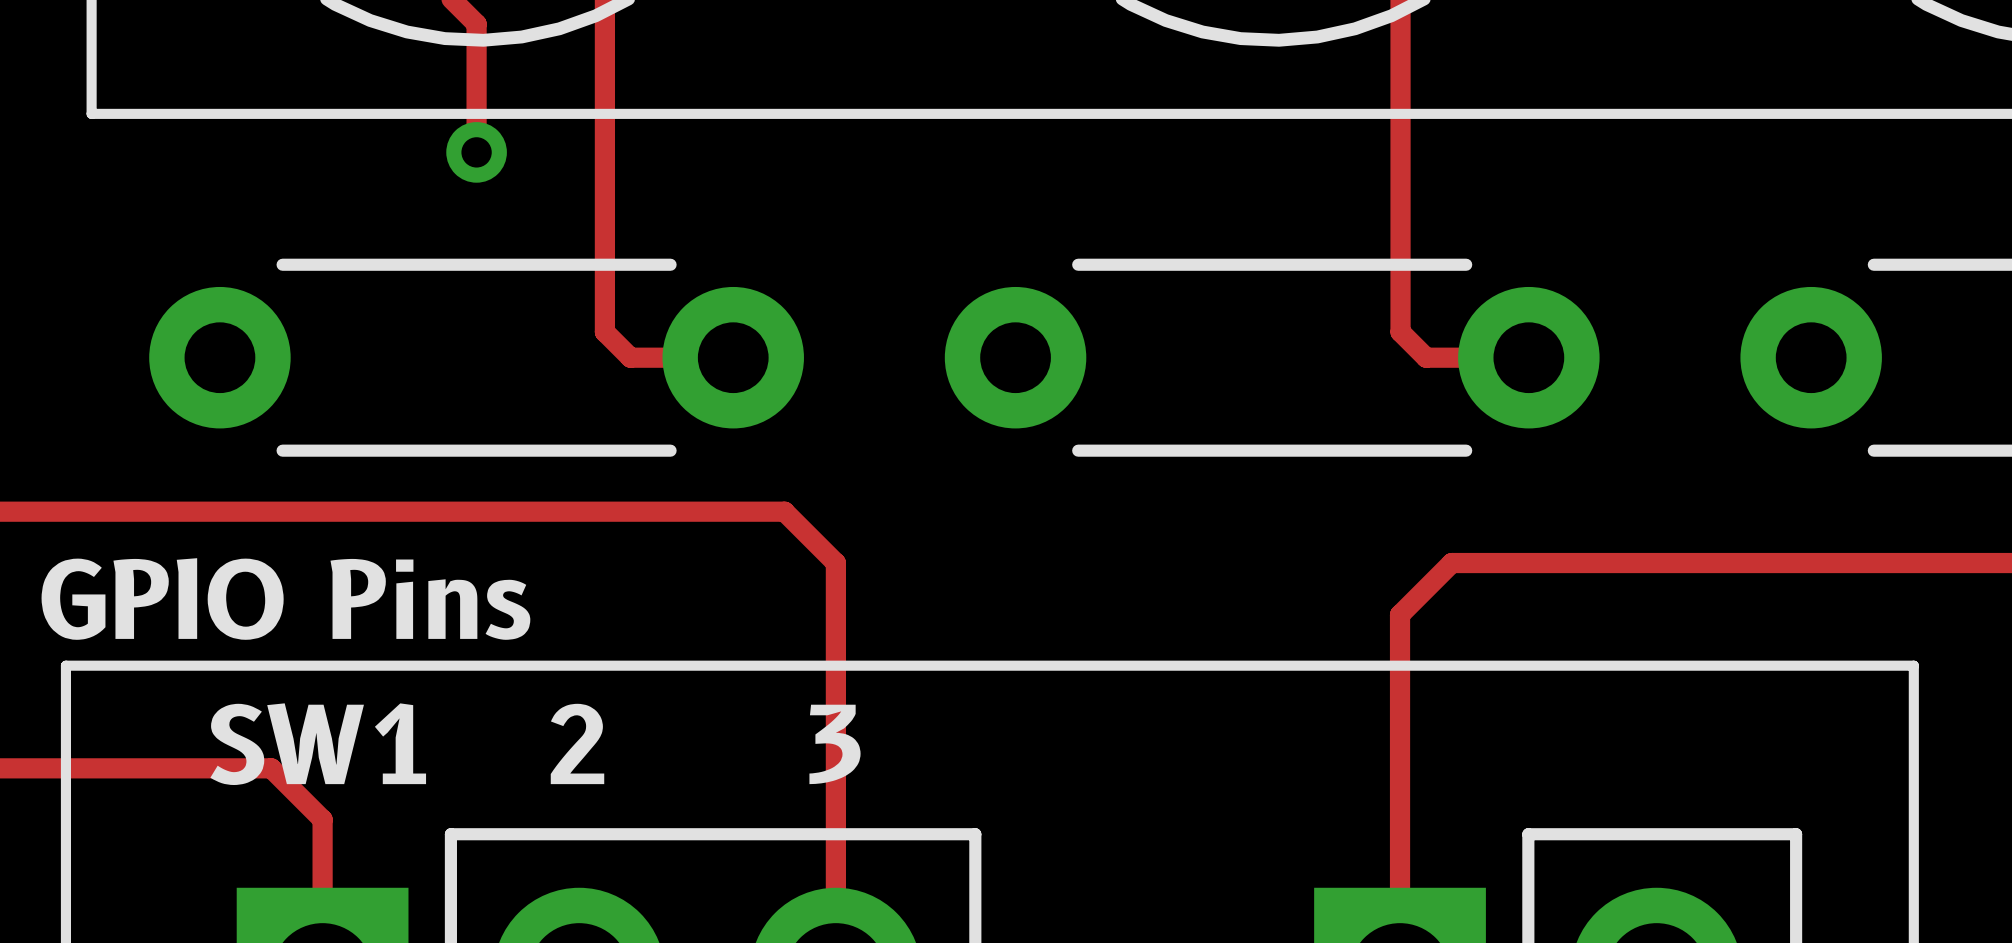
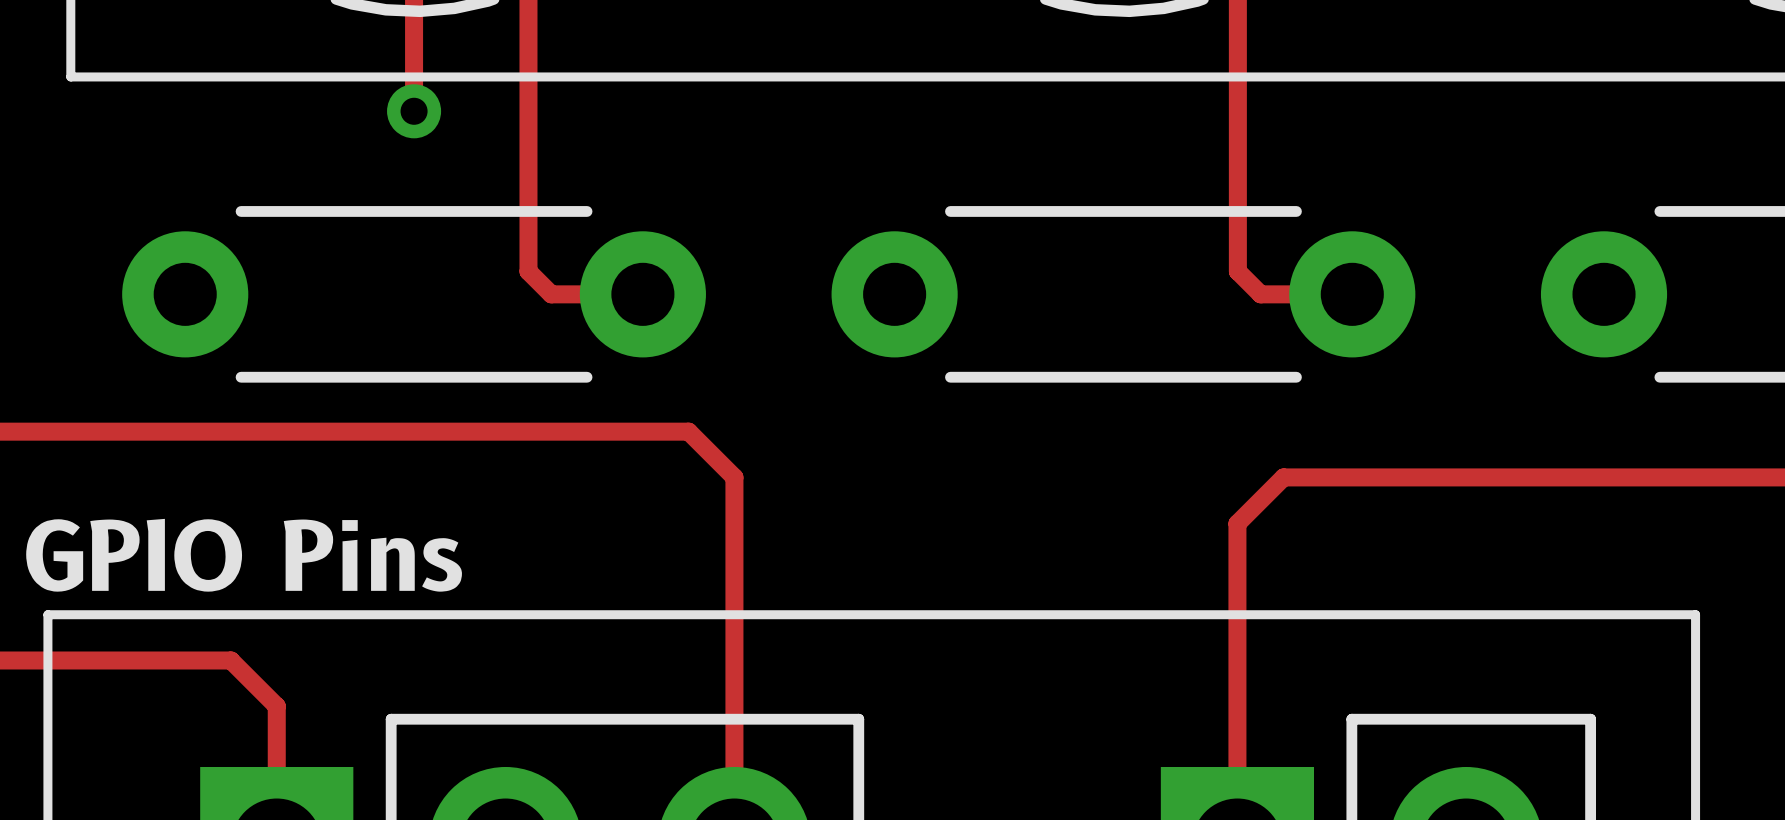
text position: GPIO Pins (285, 599) -> GPIO Pins (244, 555)
line: (65, 717) (65, 665) (1913, 665) (1913, 717) -> (47, 614) (1695, 614)
text: 2 (577, 743) -> none
text: SW1 (318, 744) -> none
text: 3 (835, 744) -> none

